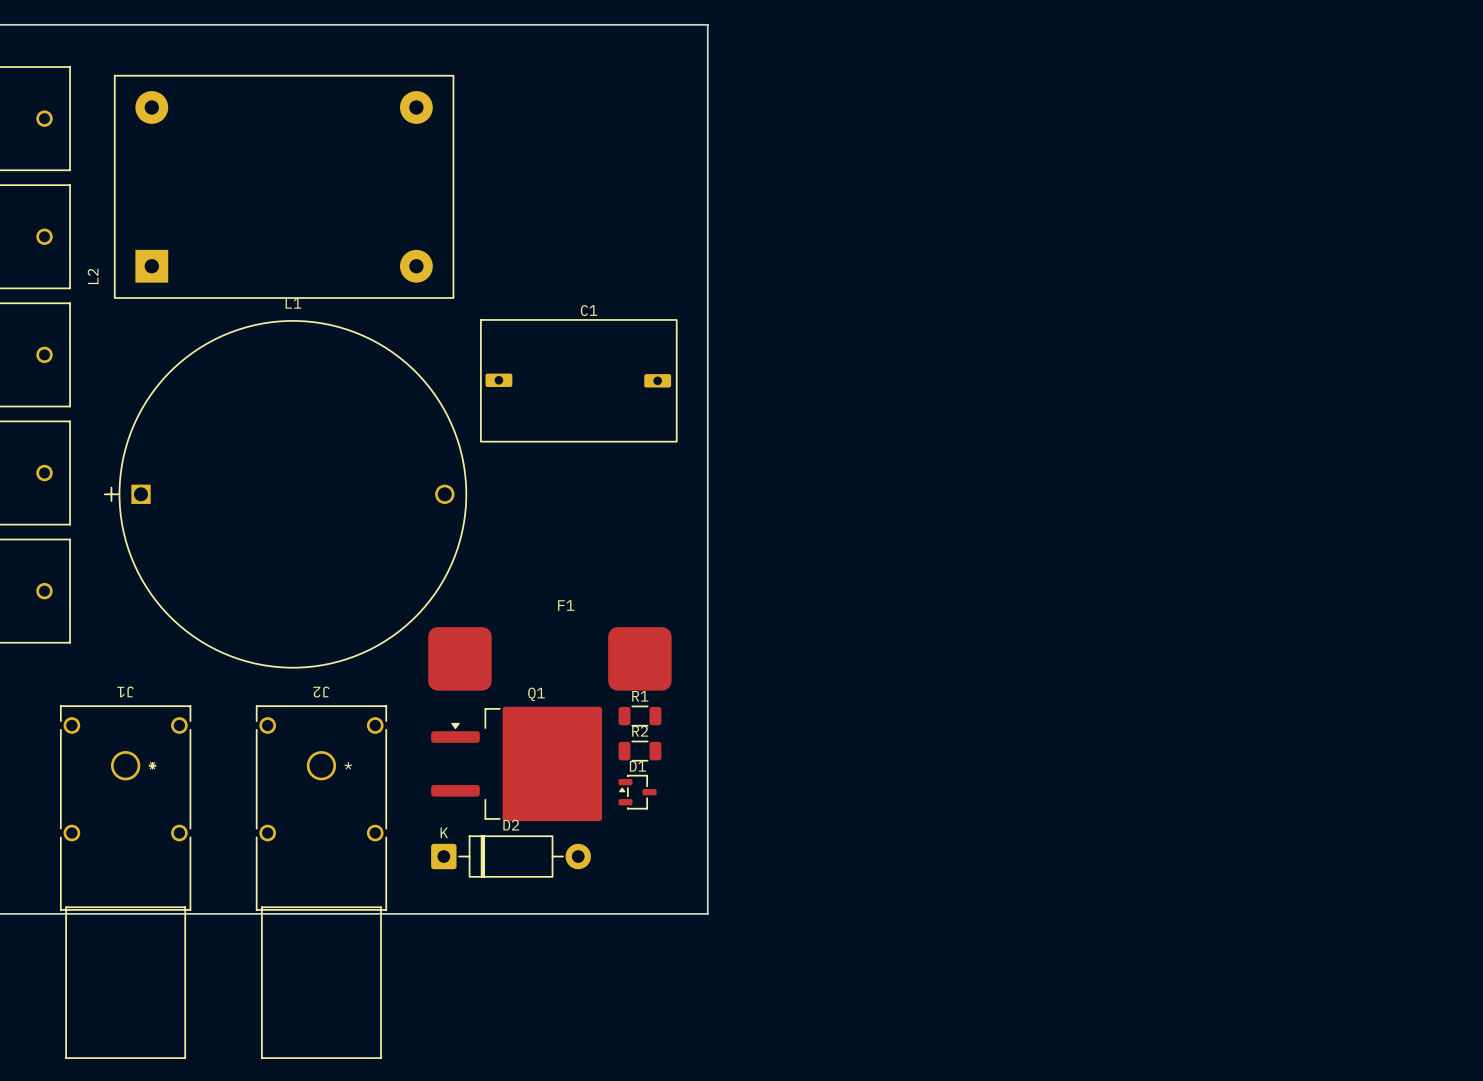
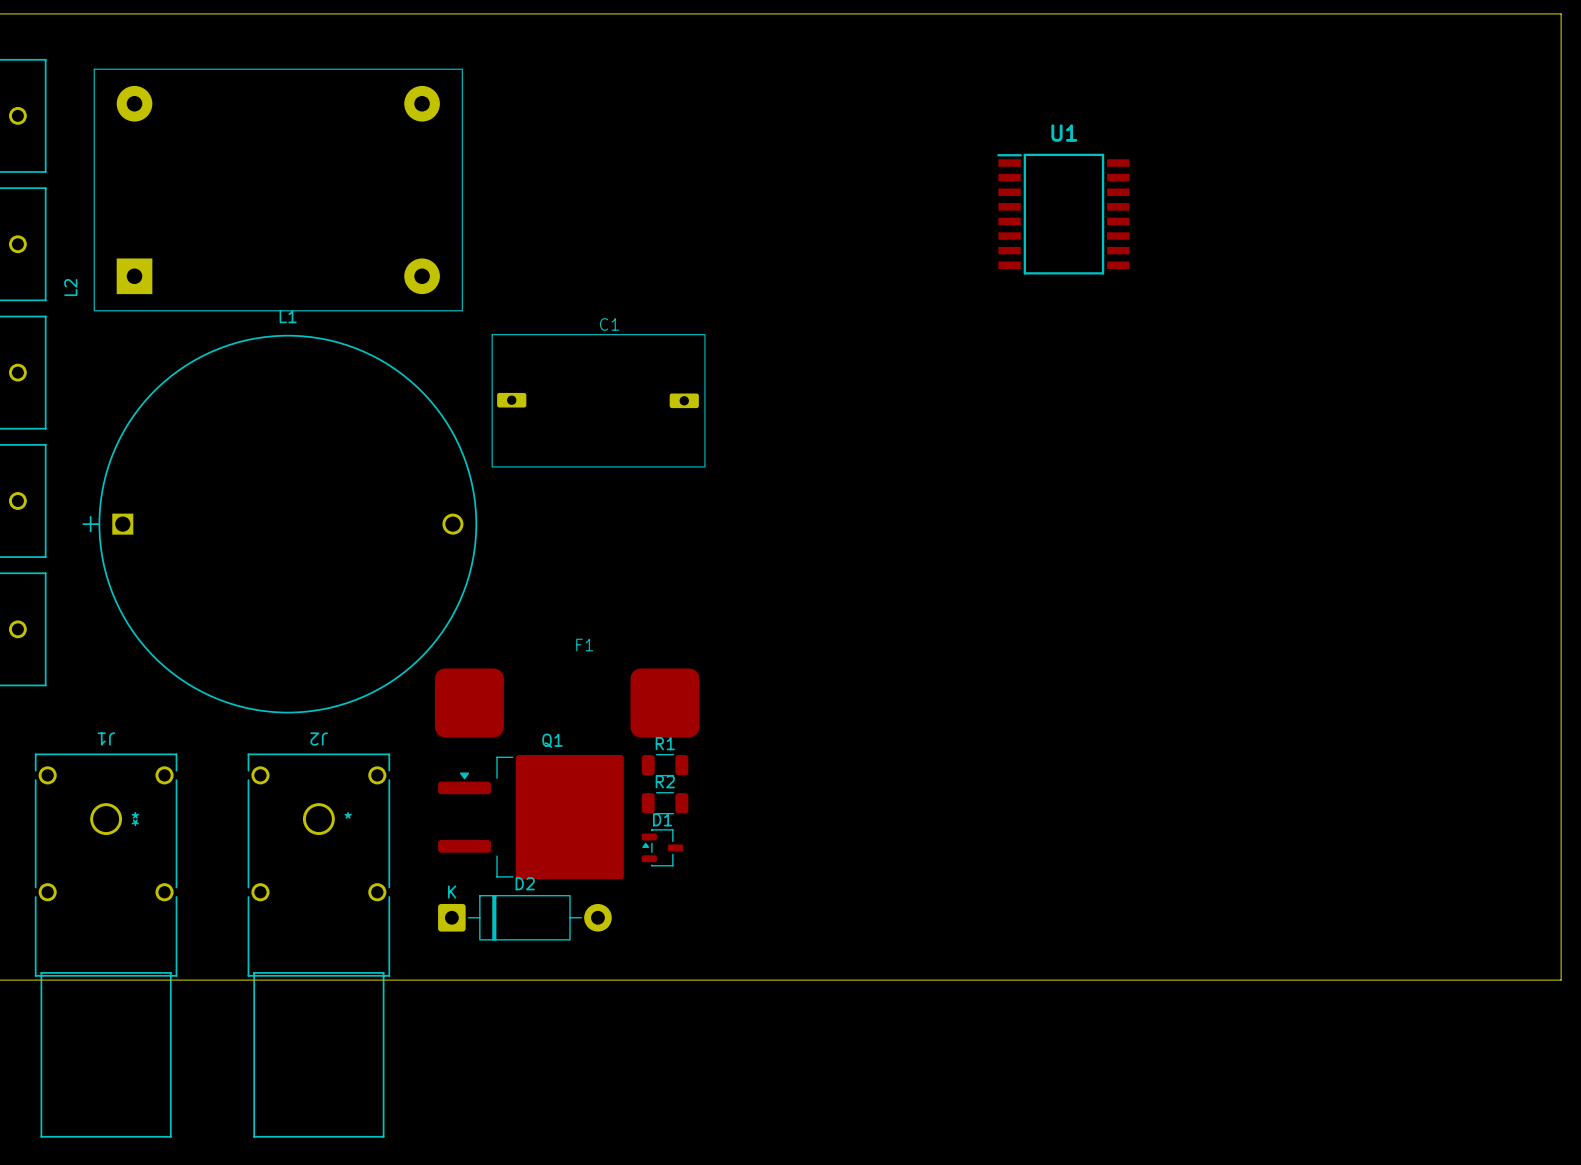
board edge: (707, 24) (707, 913) -> (738, 13) (1561, 13) (1561, 980) (738, 980)
U1: none -> (1063, 214)

